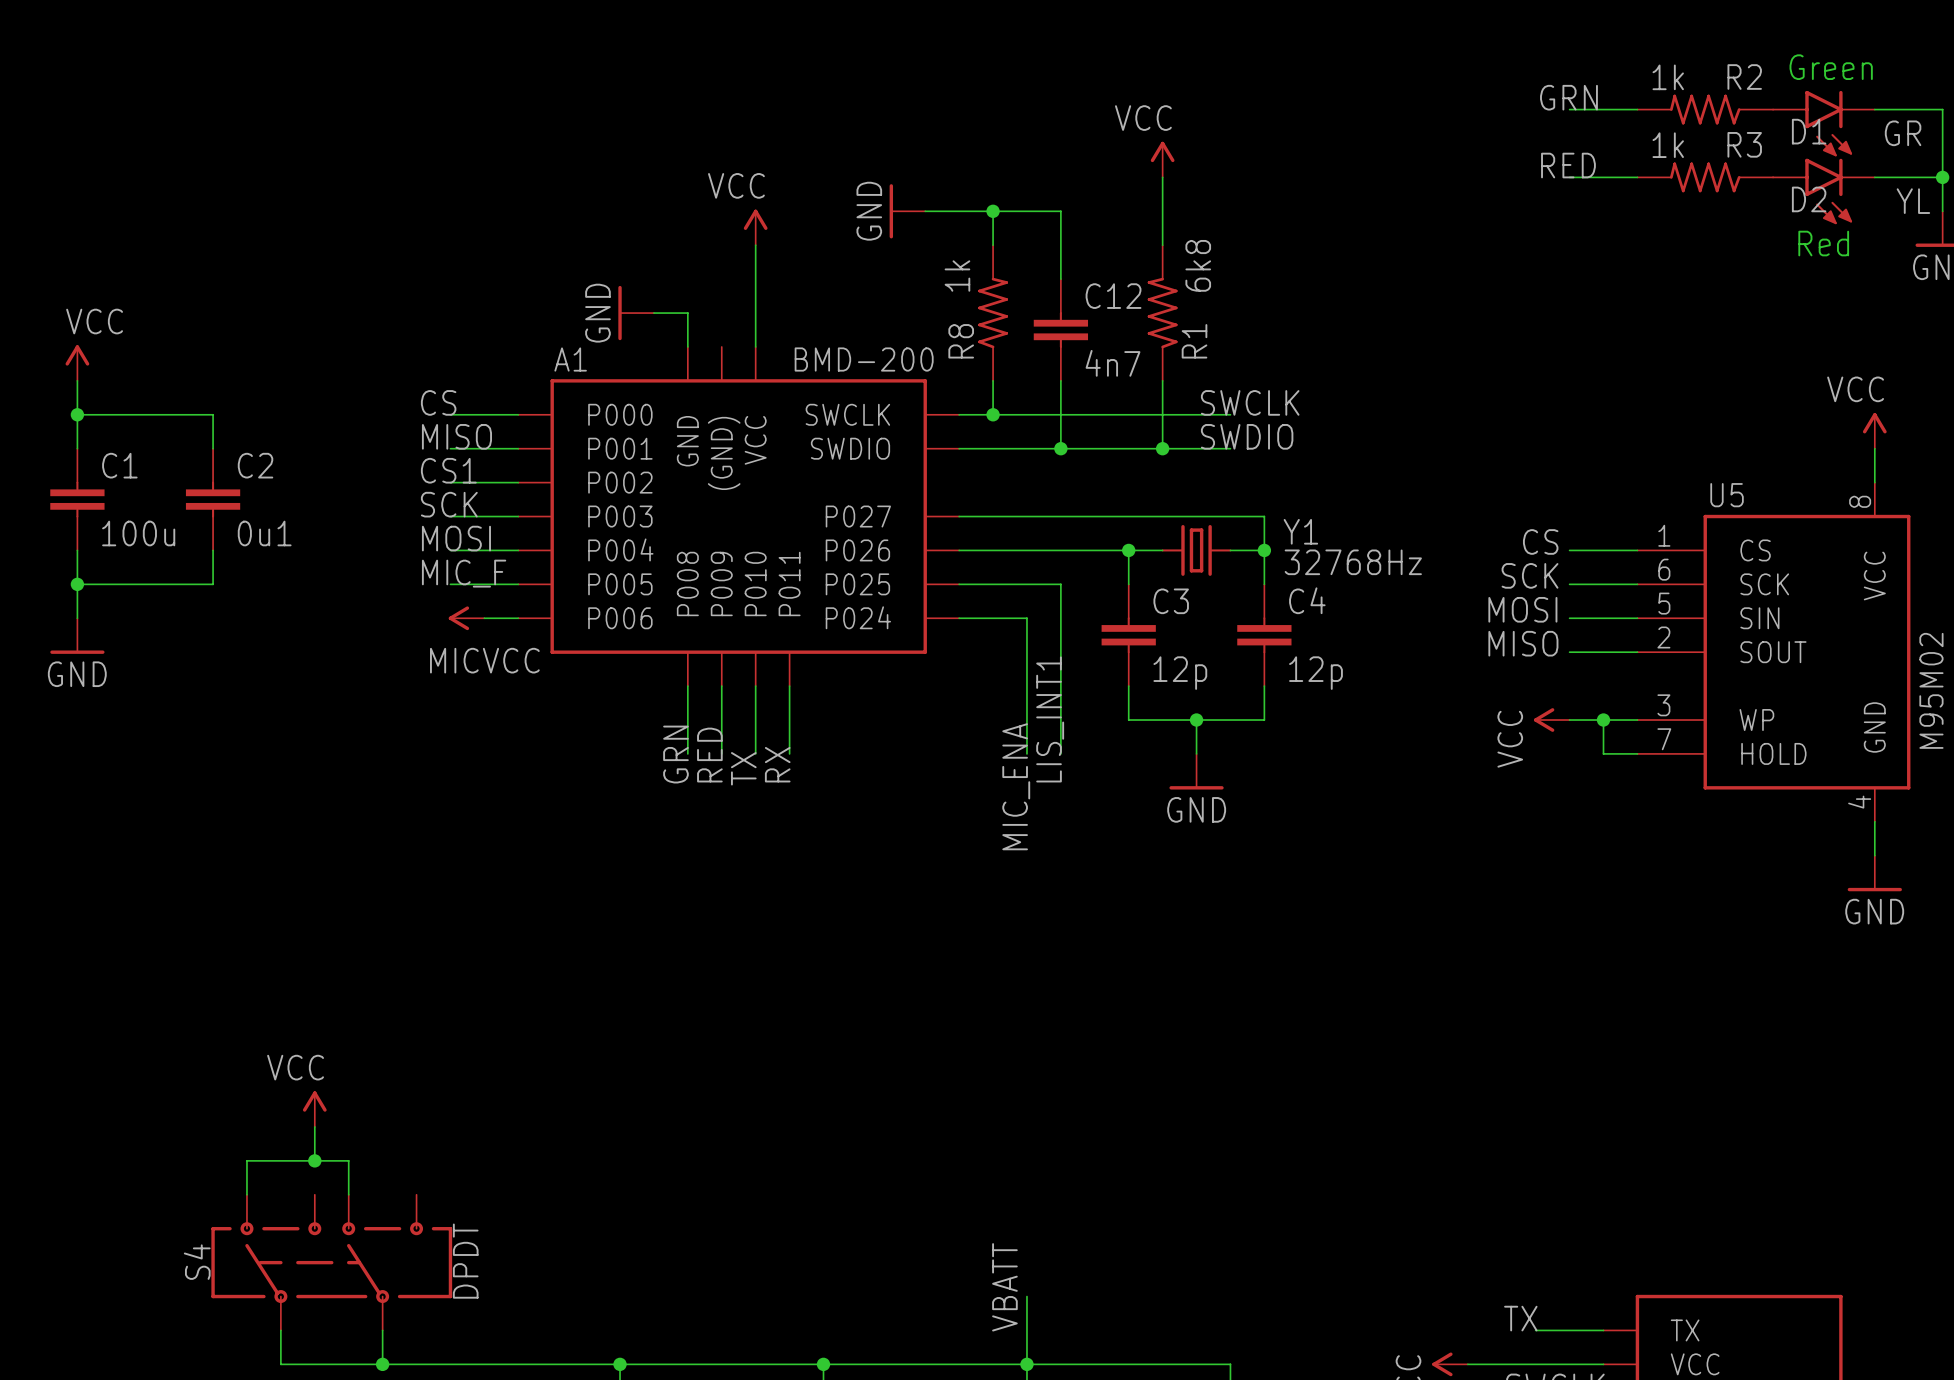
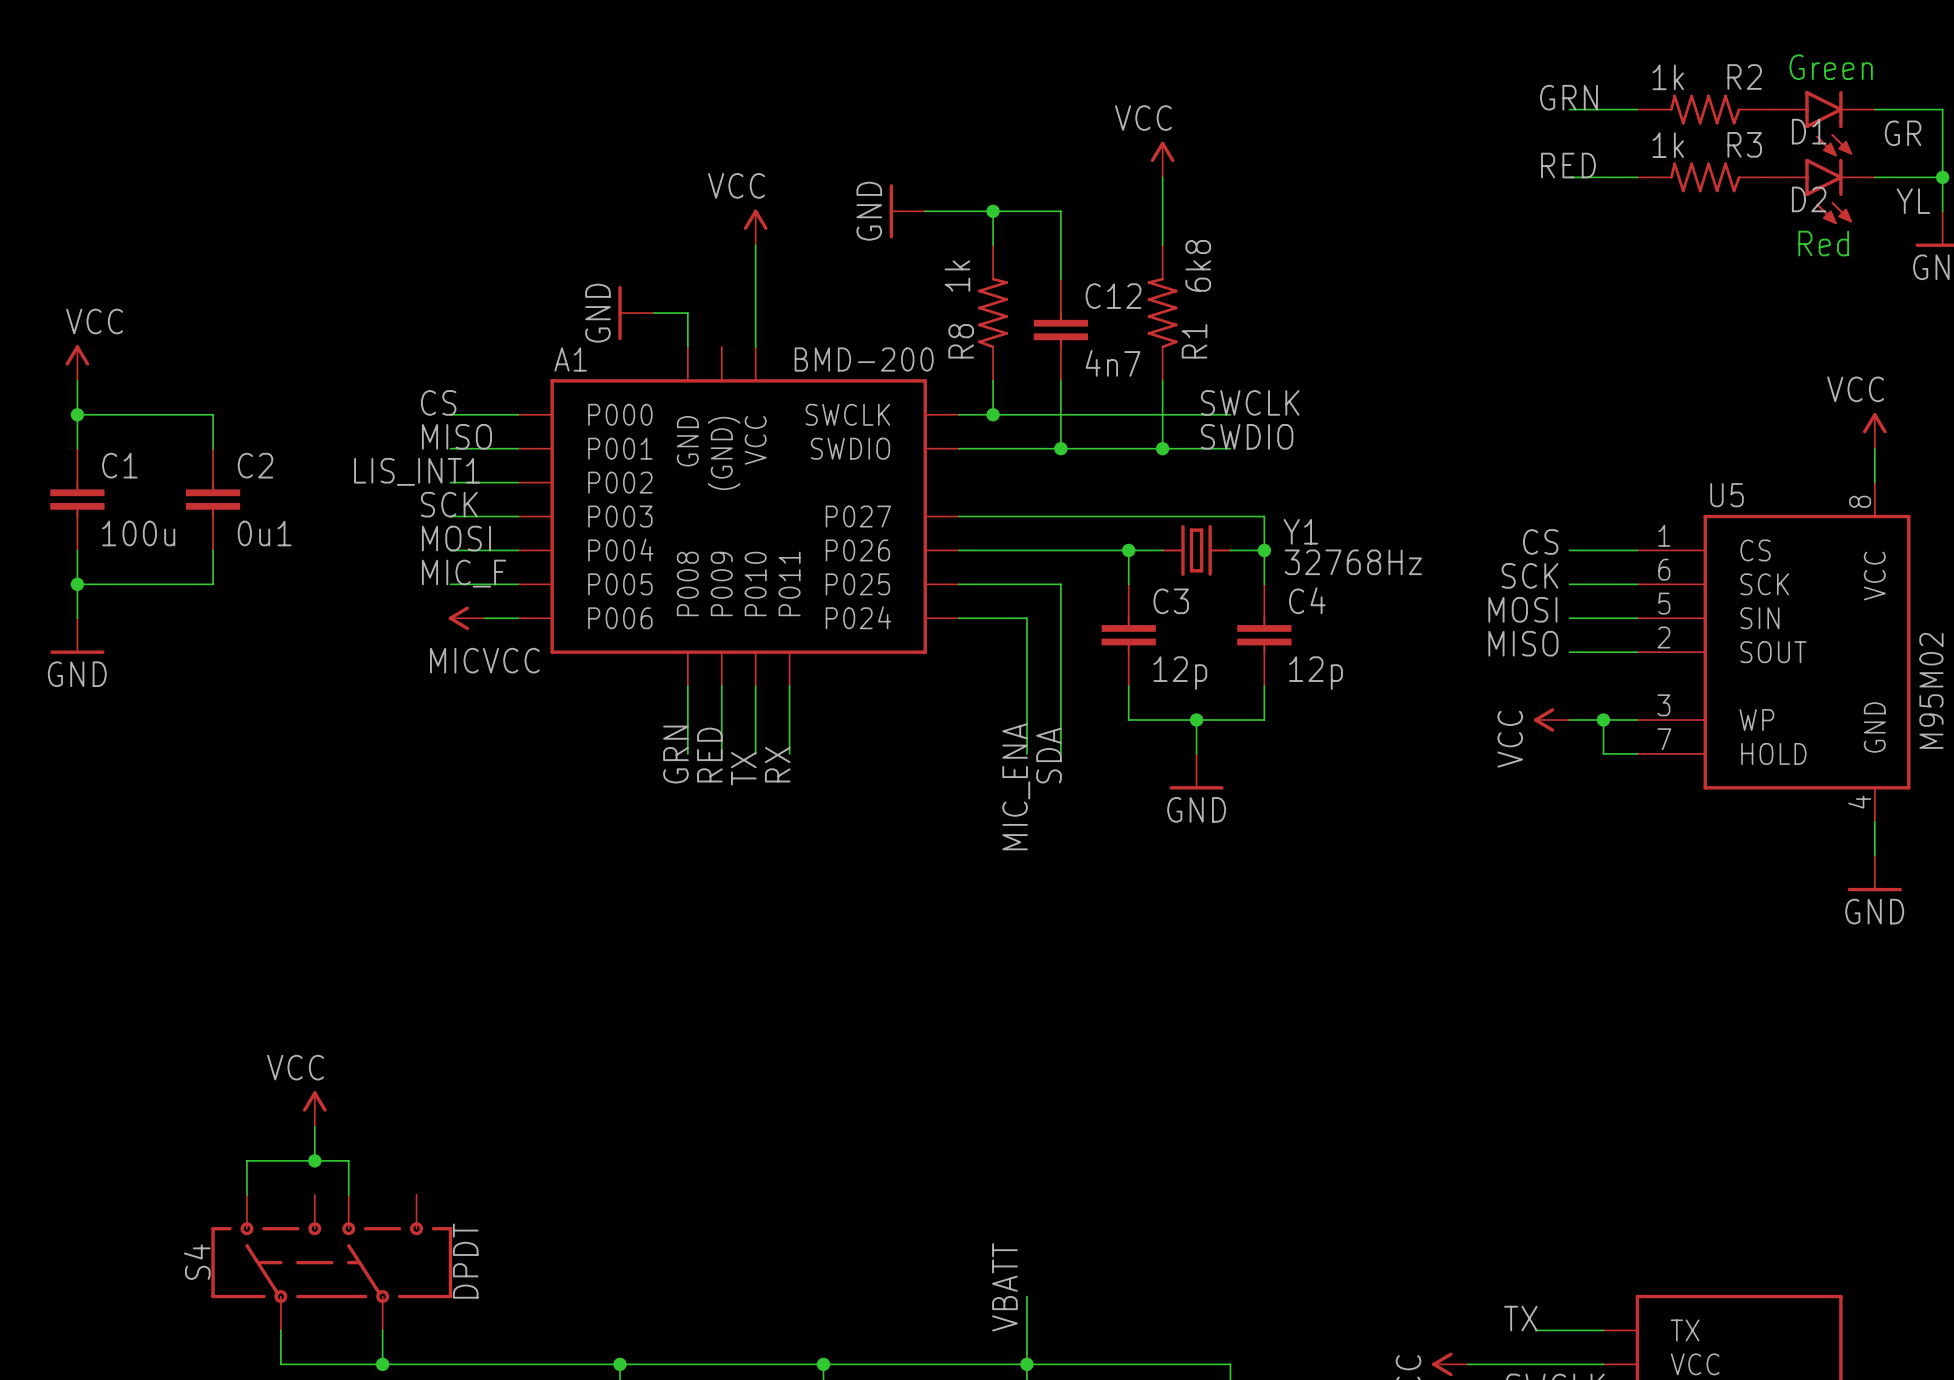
label: CS1 (448, 470) -> none
label: none -> LIS_INT1 (417, 471)
label: LIS_INT1 (1050, 719) -> SDA (1049, 755)

